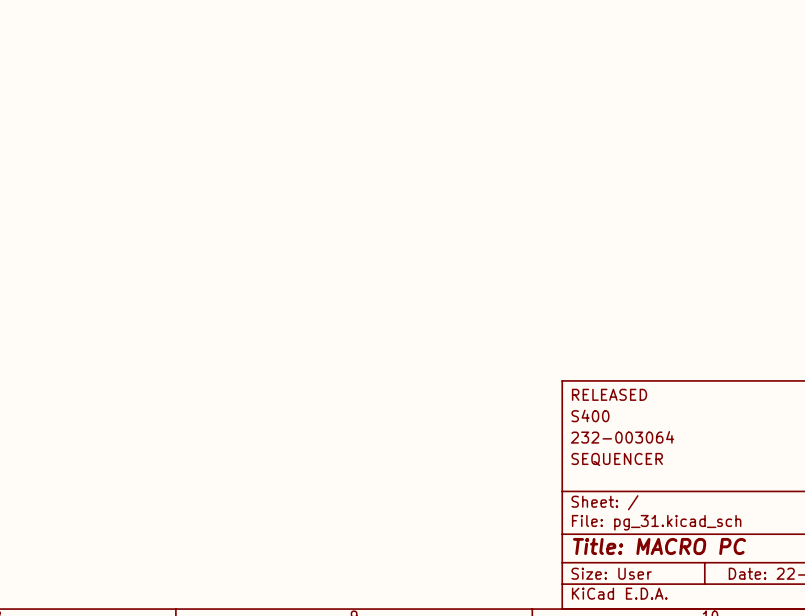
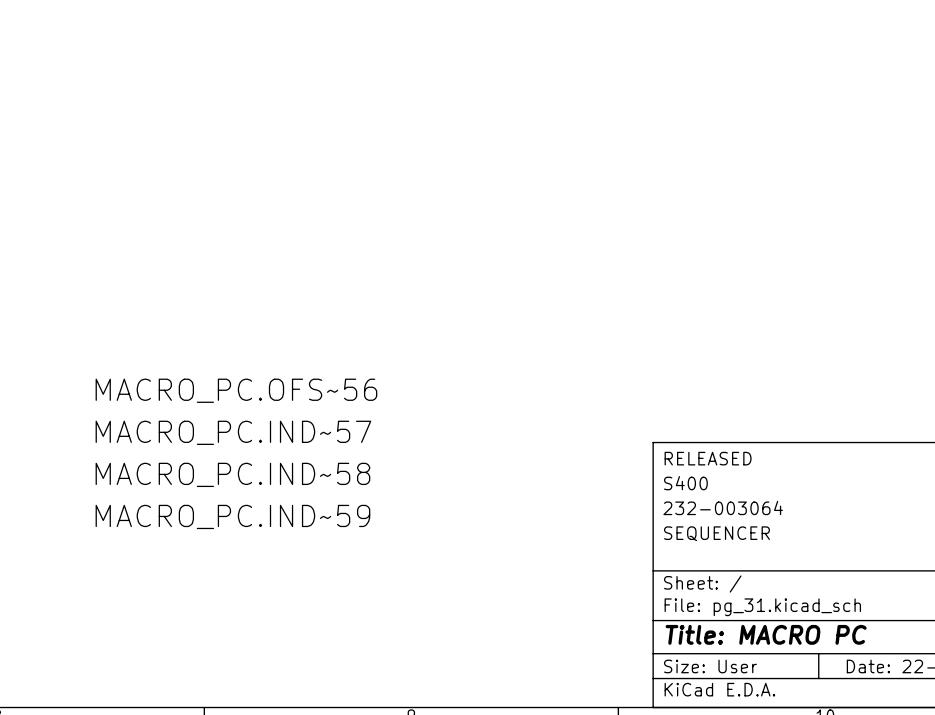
label: none -> MACRO_PC.OFS~56 (236, 390)
label: none -> MACRO_PC.IND~57 (233, 432)
label: none -> MACRO_PC.IND~58 (232, 474)
label: none -> MACRO_PC.IND~59 (232, 516)

